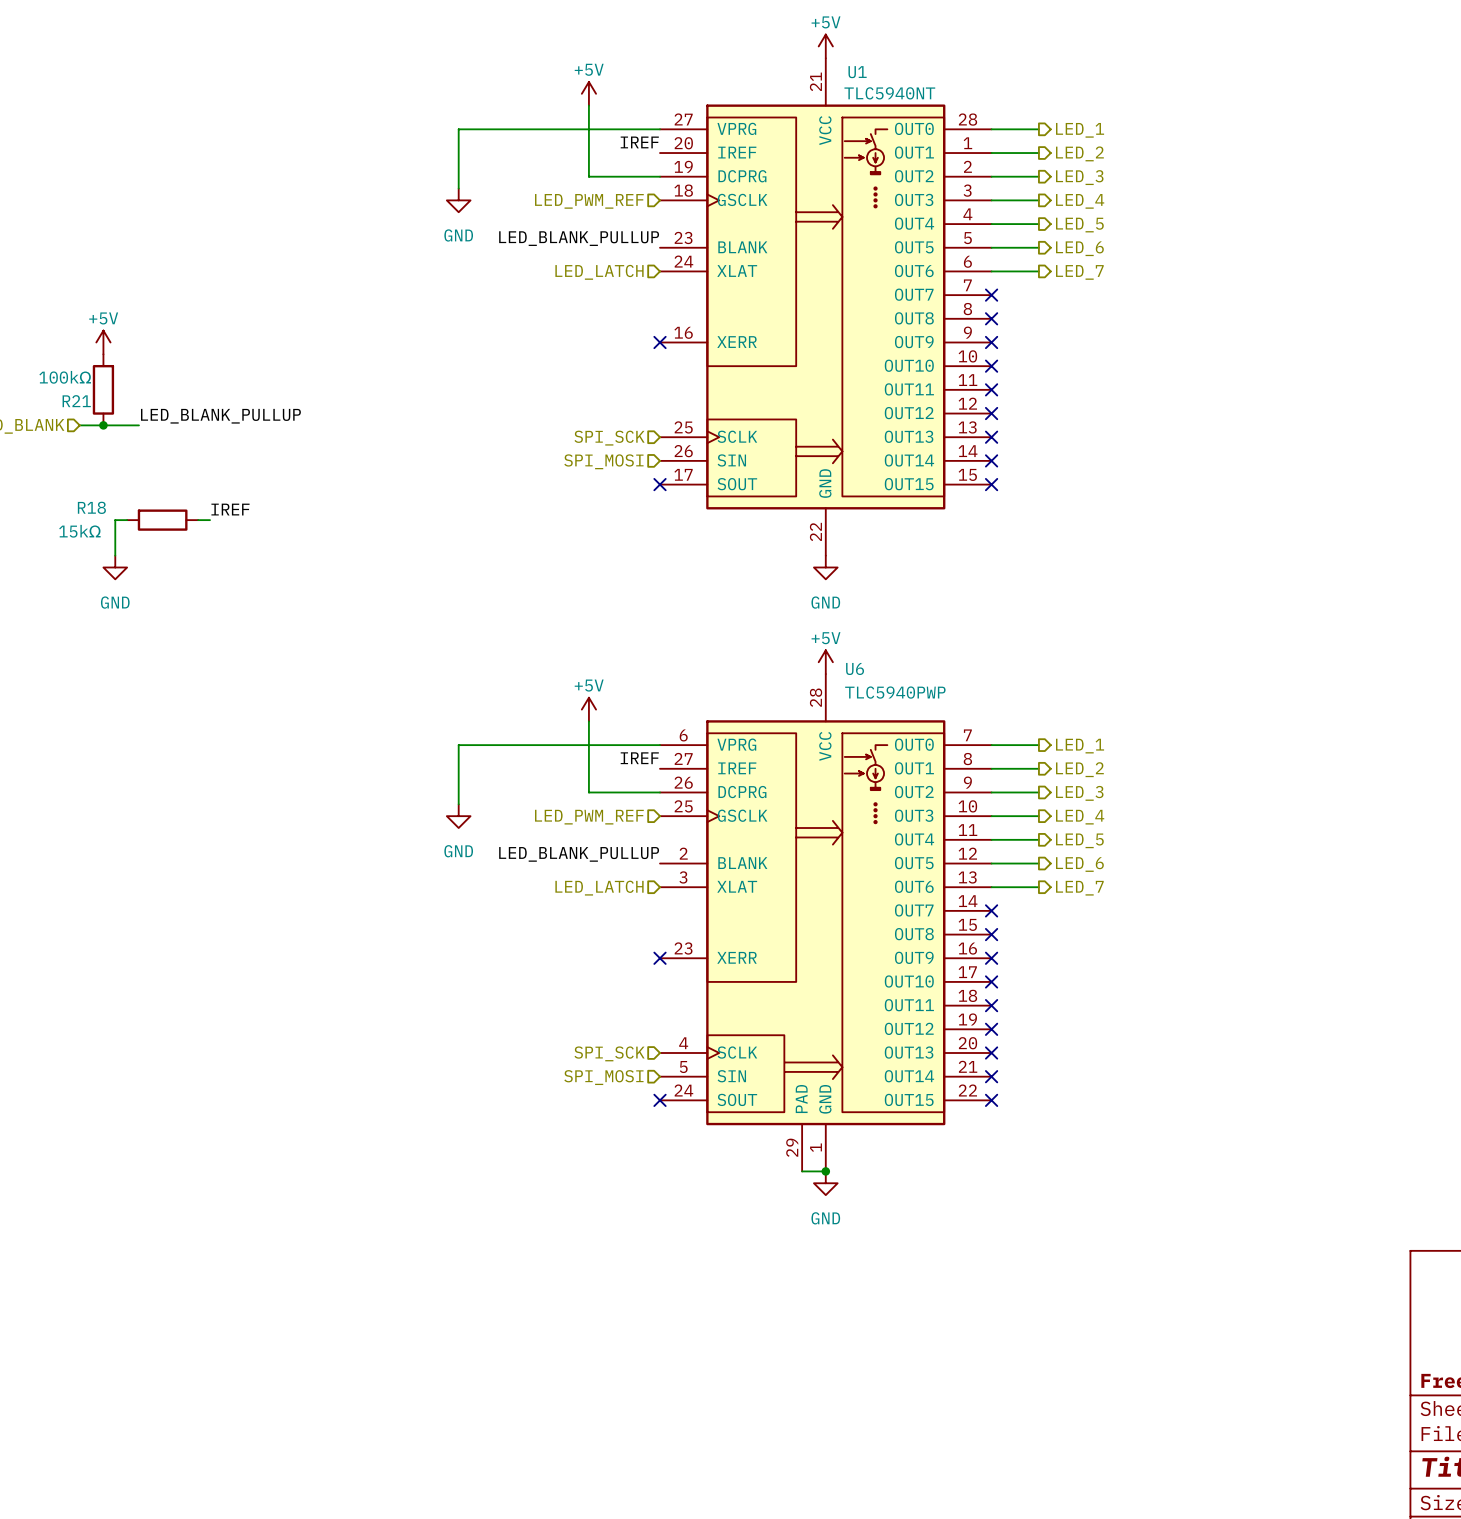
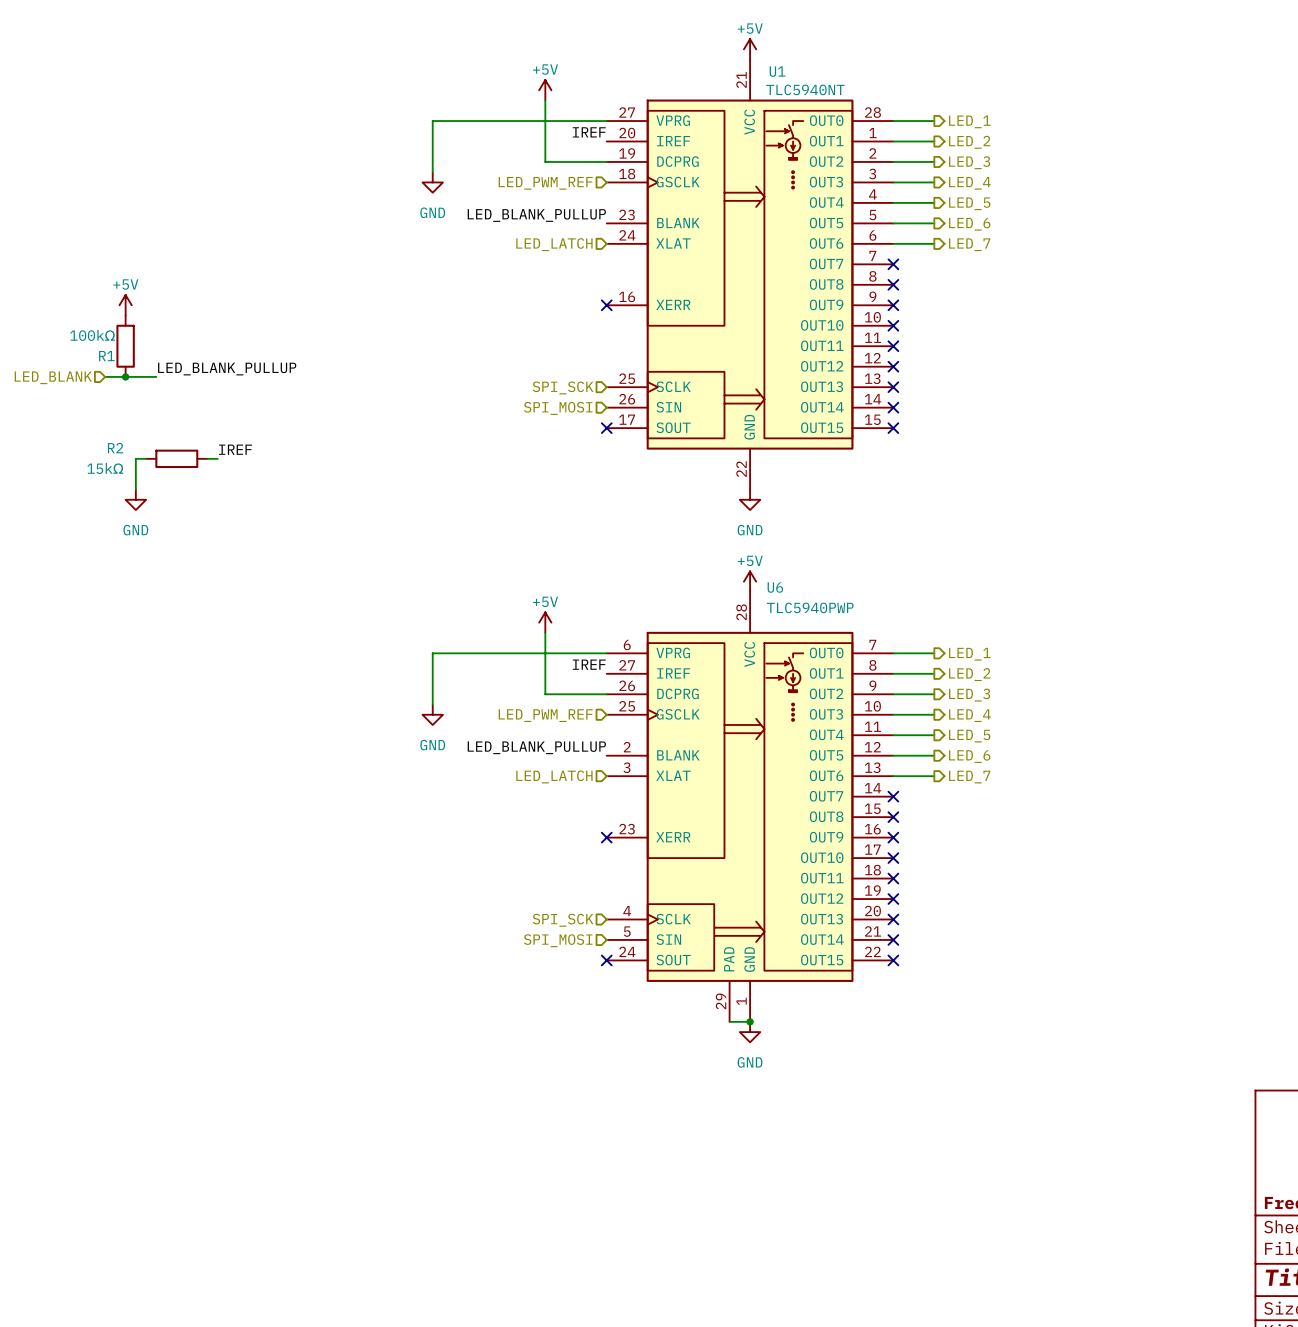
R21 name: R21 (76, 401) -> R1 (106, 356)
R18 name: R18 (91, 507) -> R2 (115, 448)

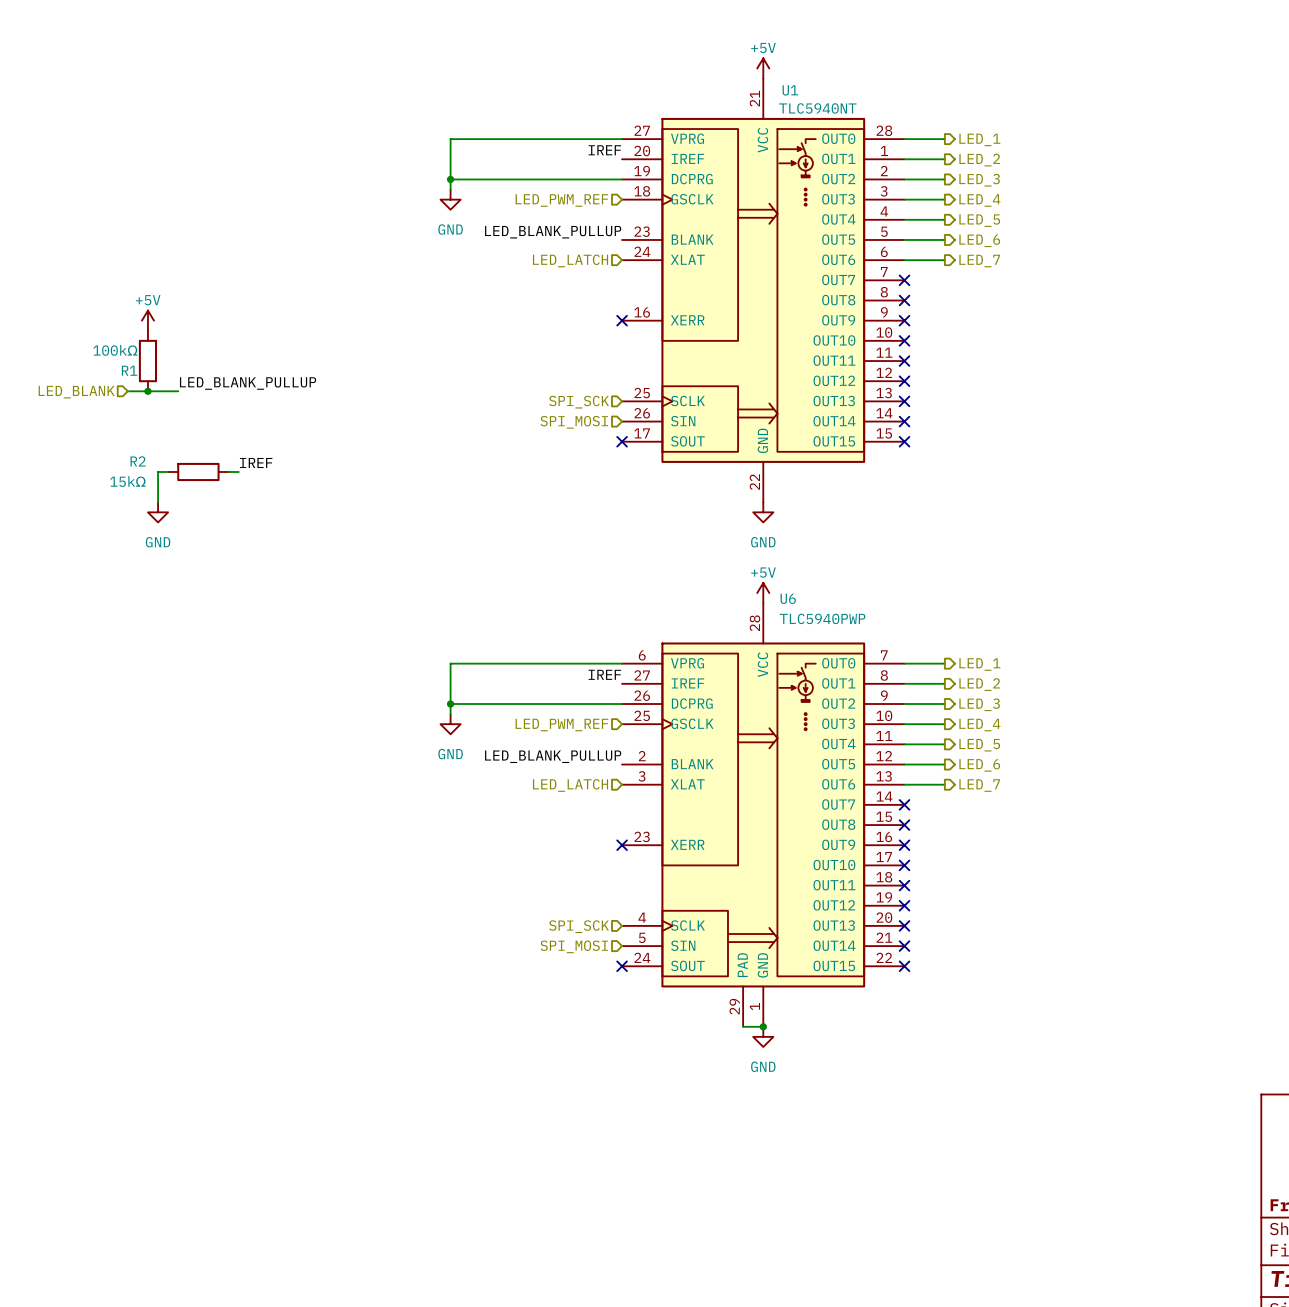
power symbol: +5V (545, 90) -> none
wire: (545, 100) (545, 161) -> (450, 179) (561, 179)
junction: none -> (450, 179)
power symbol: +5V (545, 622) -> none
wire: (545, 632) (545, 694) -> (450, 704) (561, 704)
junction: none -> (450, 704)

